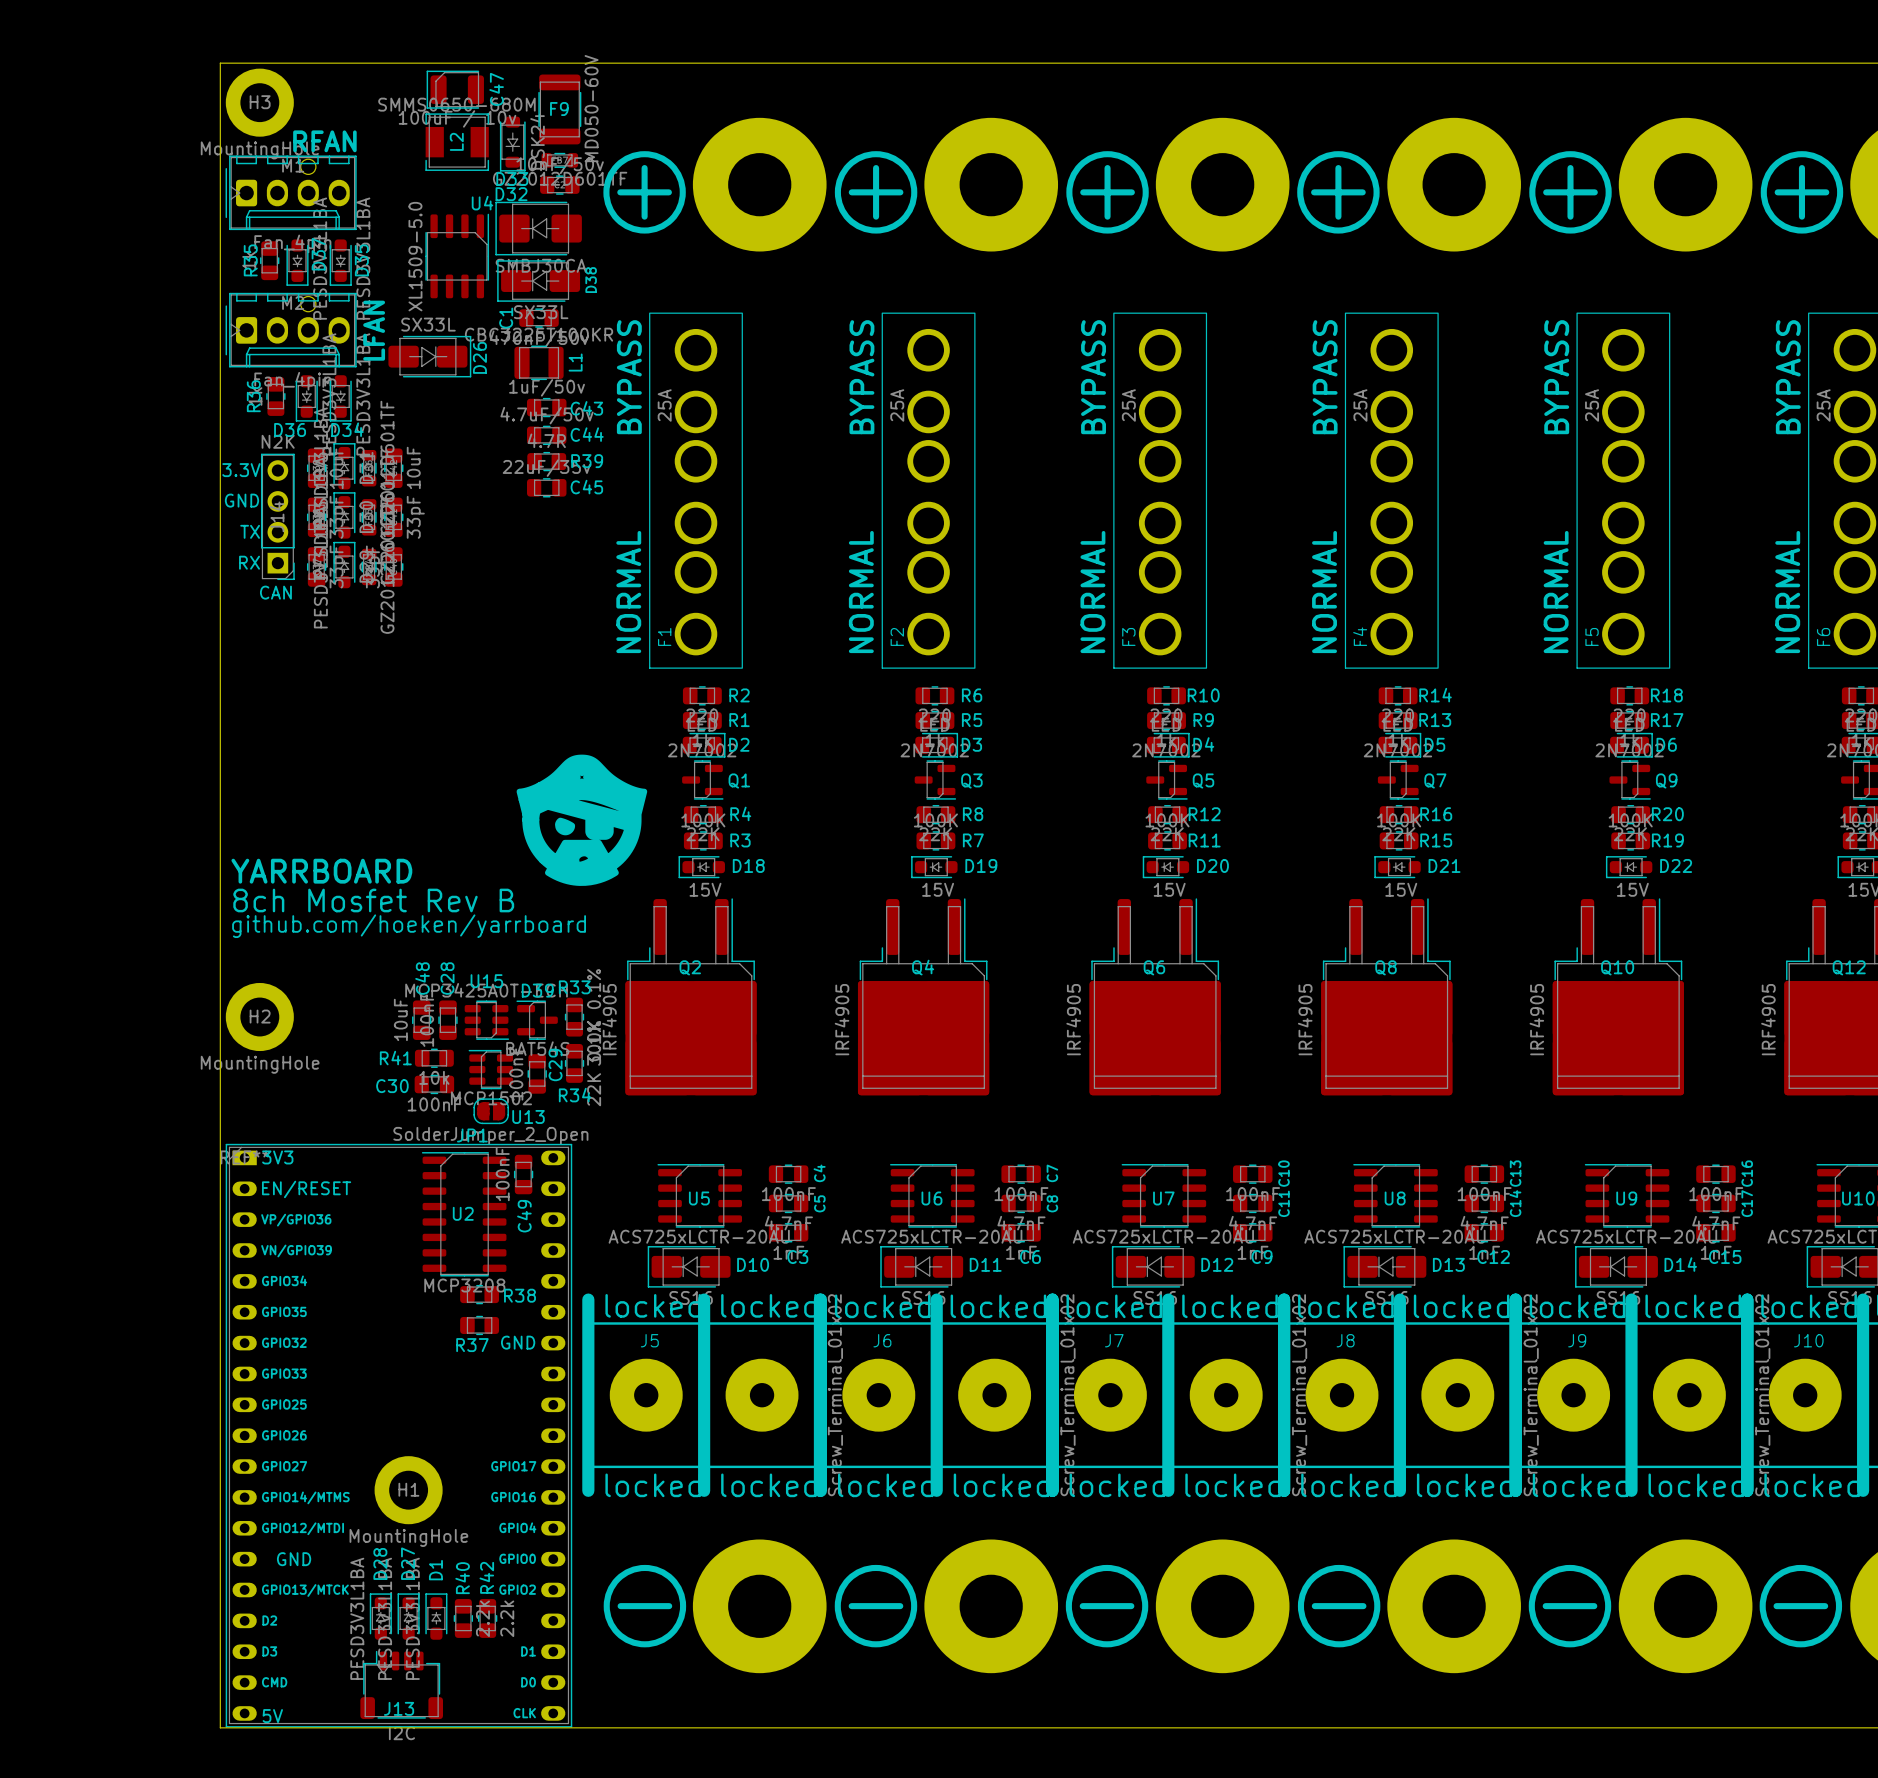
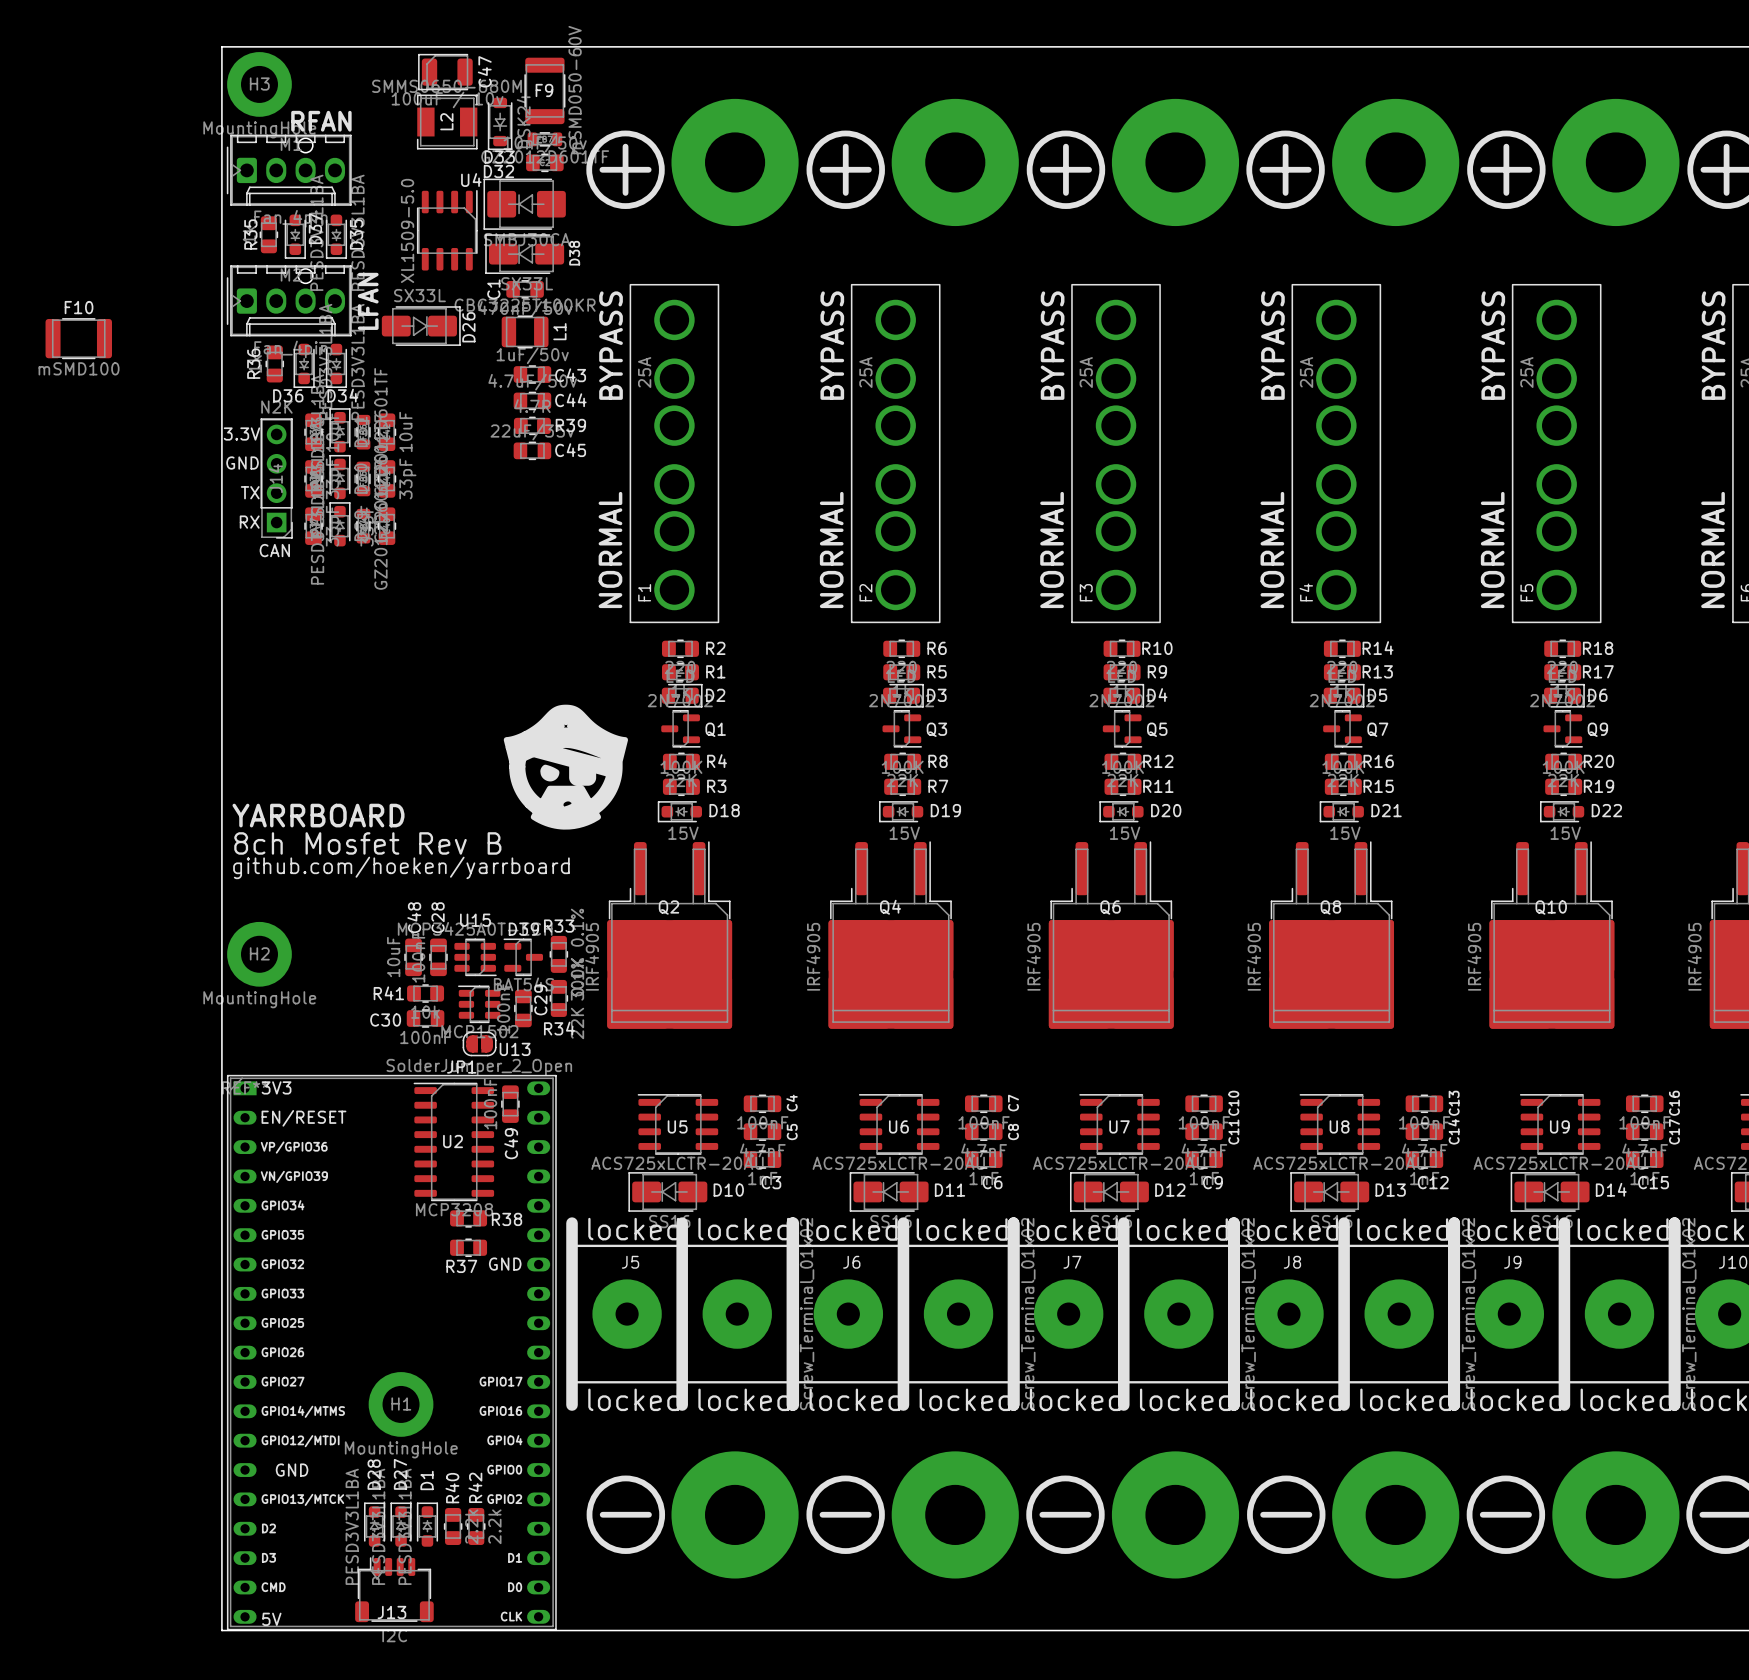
F9 value: MD050-60V (591, 108) -> mSMD050-60V (575, 90)
F10: none -> mSMD100 (78, 338)

